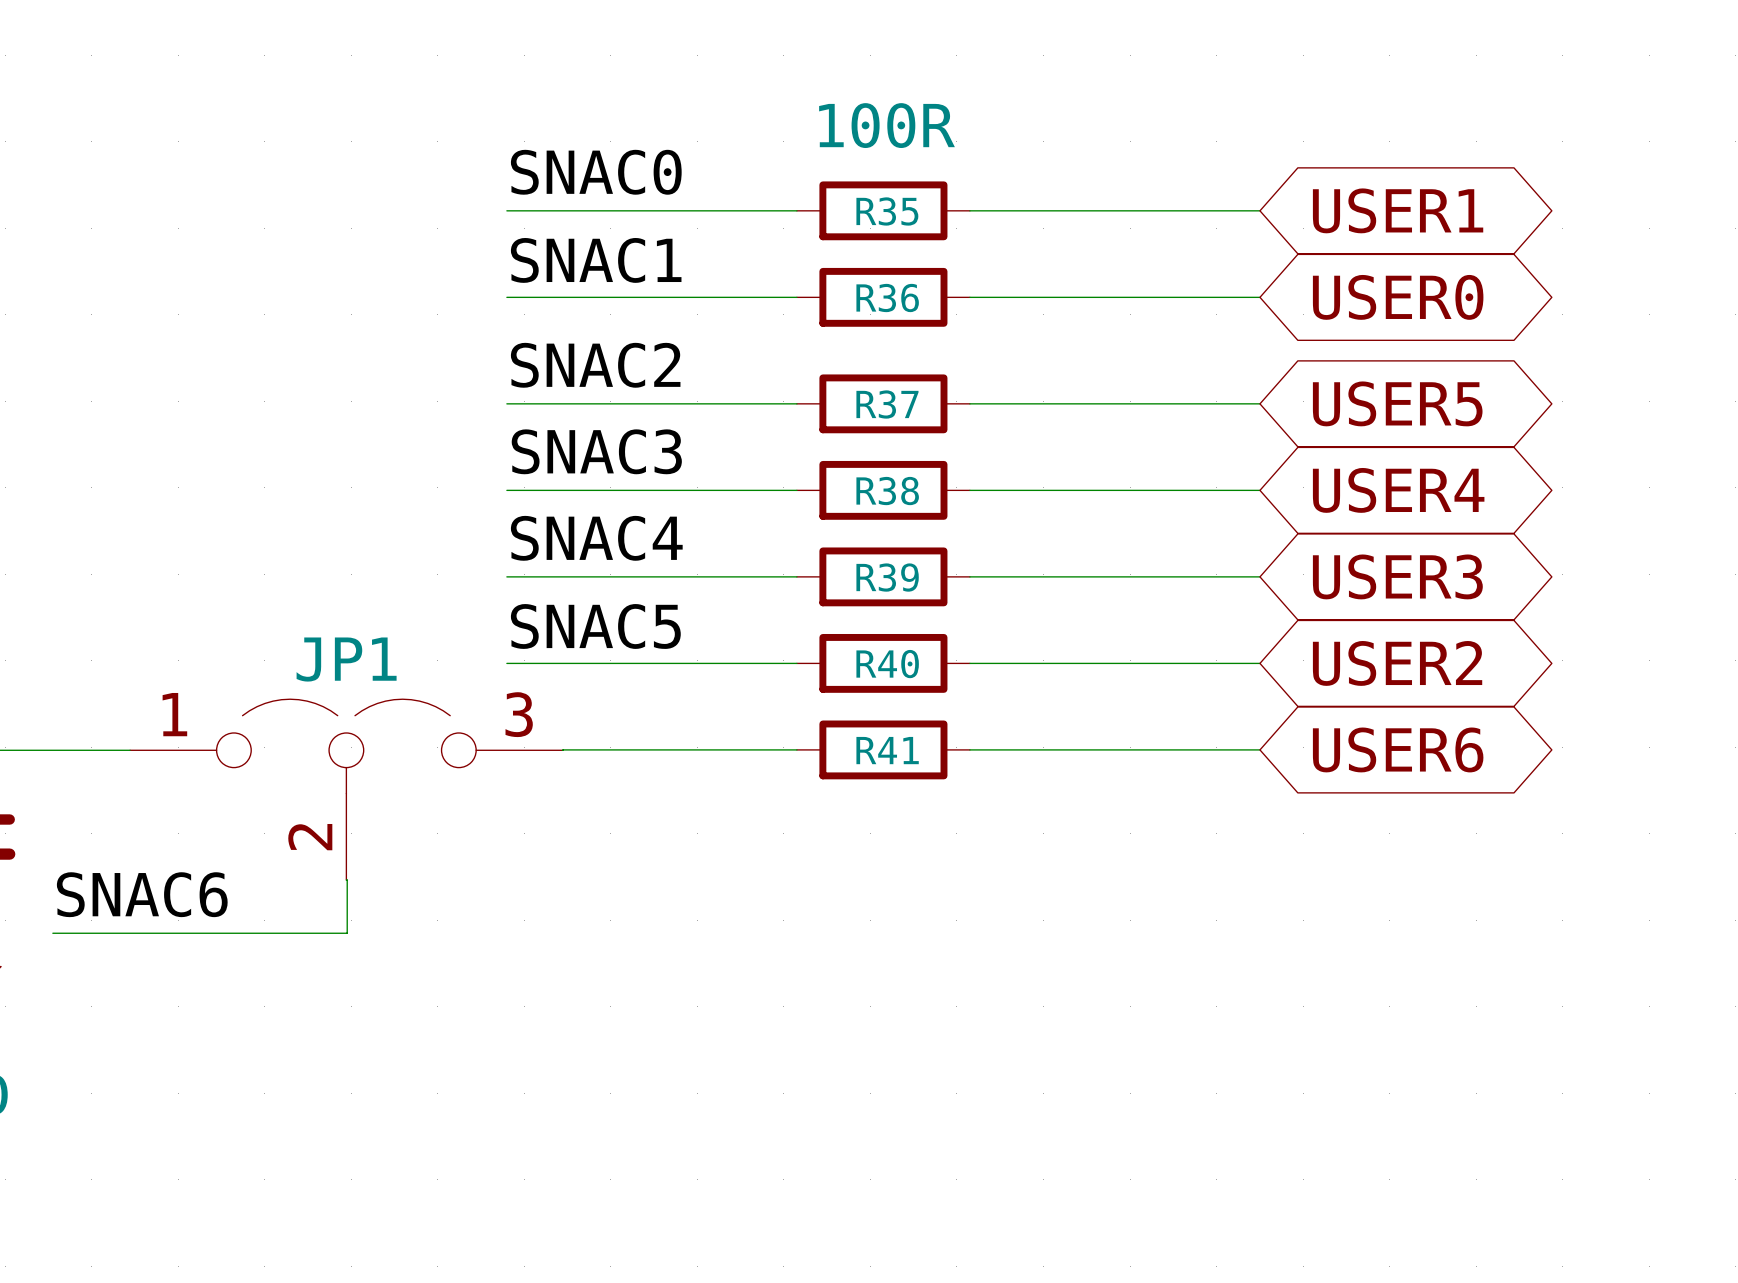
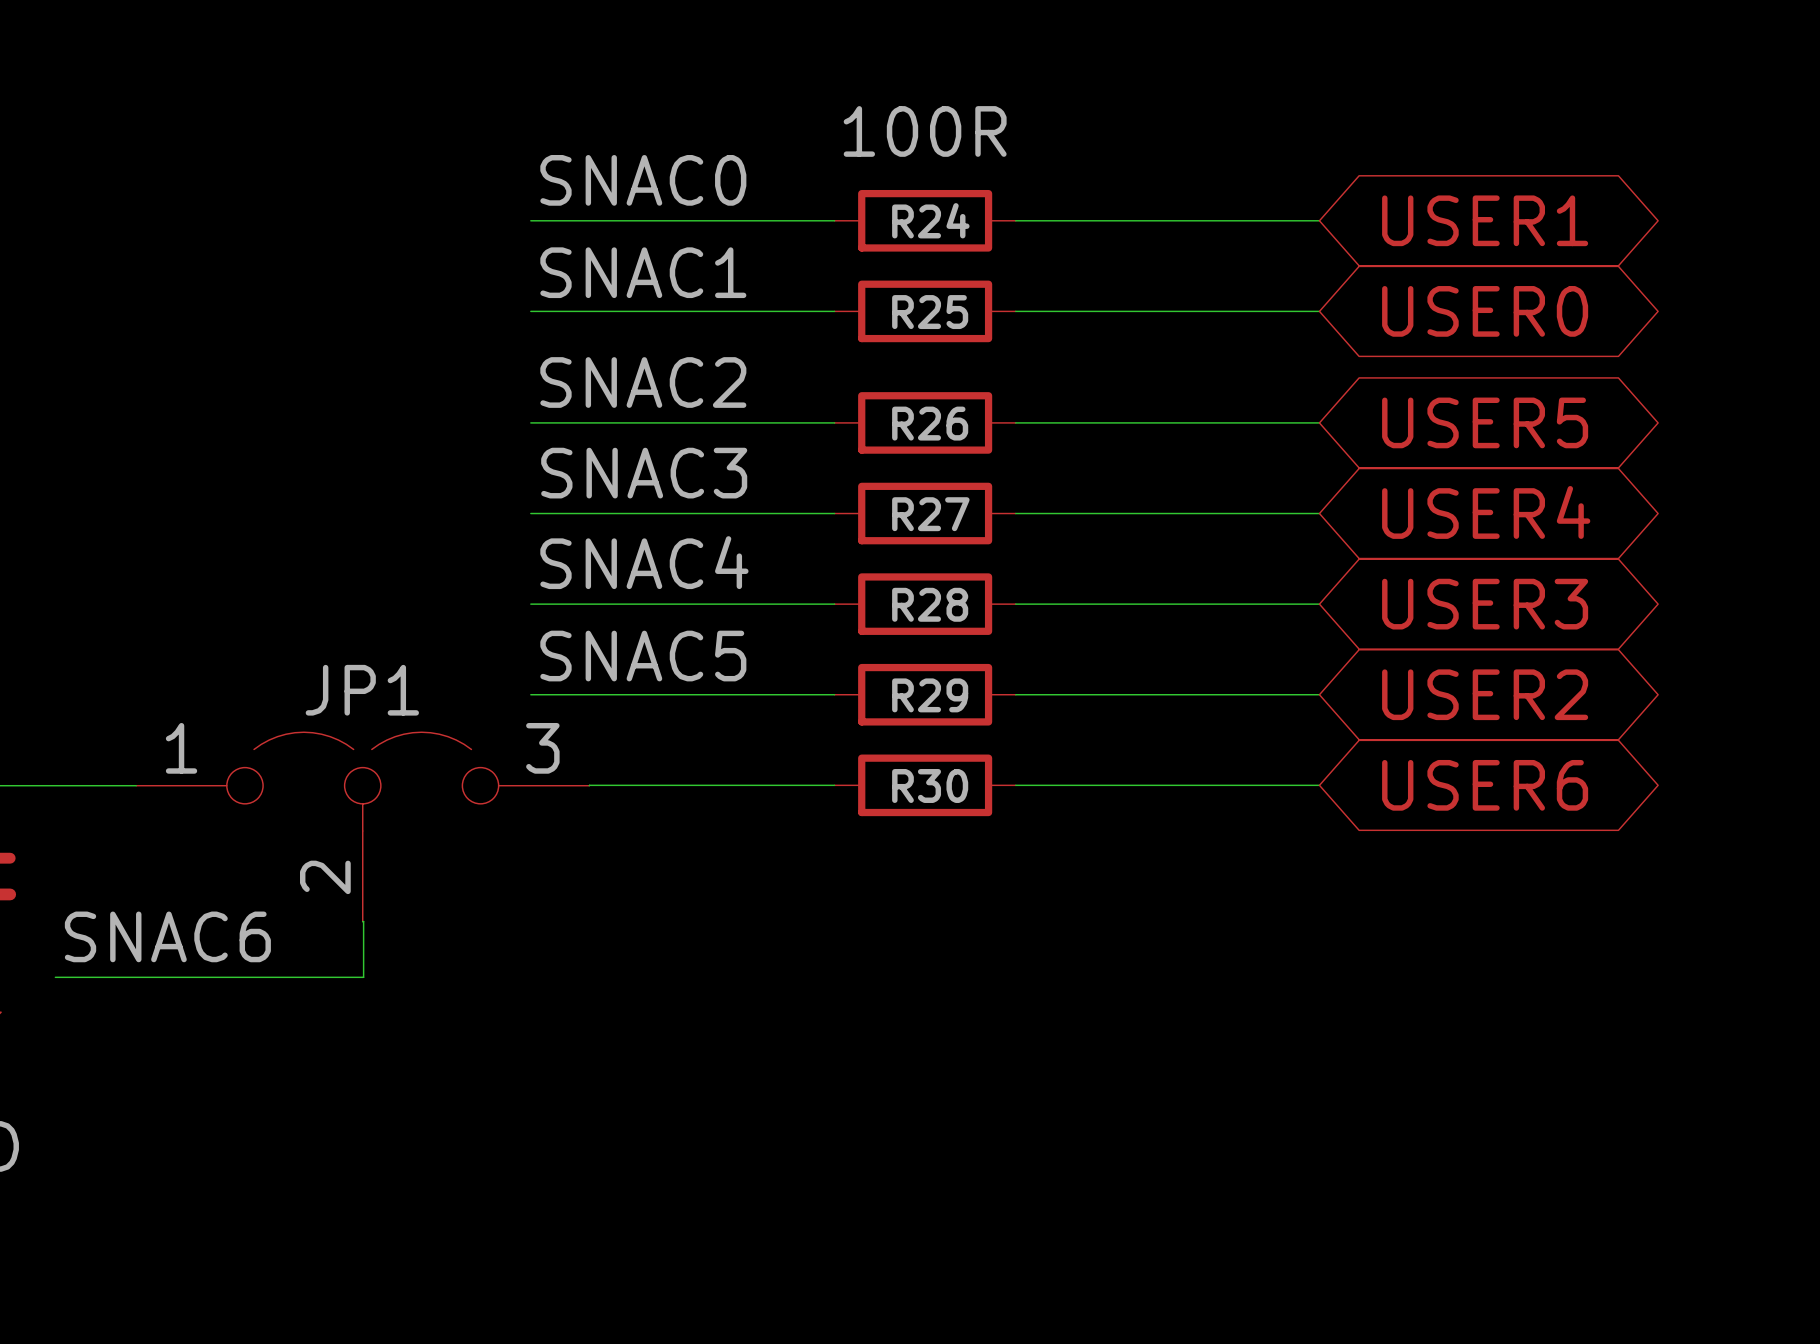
R35 name: R35 (887, 211) -> R24 (930, 220)
R36 name: R36 (887, 298) -> R25 (930, 312)
R37 name: R37 (887, 404) -> R26 (930, 423)
R38 name: R38 (887, 491) -> R27 (930, 514)
R39 name: R39 (887, 577) -> R28 (930, 604)
R40 name: R40 (887, 664) -> R29 (930, 695)
R41 name: R41 (887, 750) -> R30 (930, 785)

